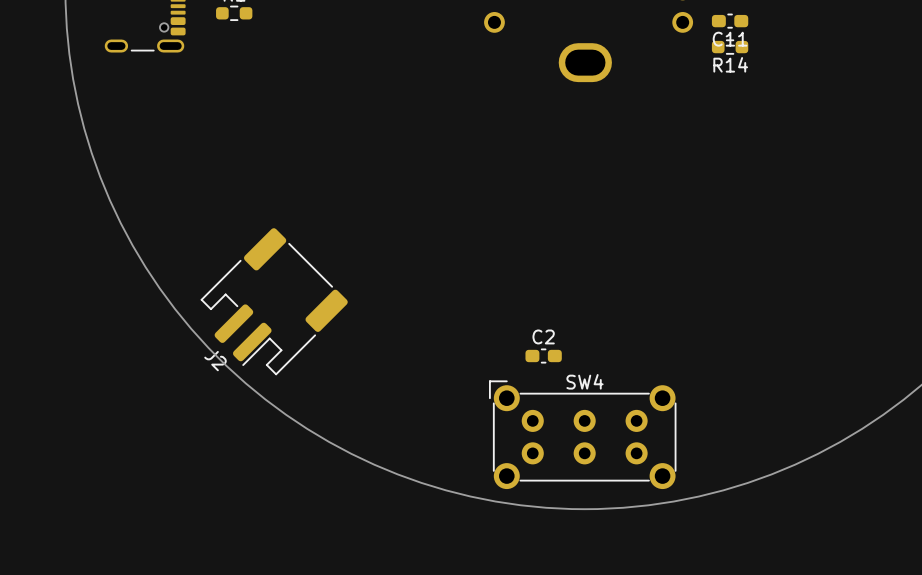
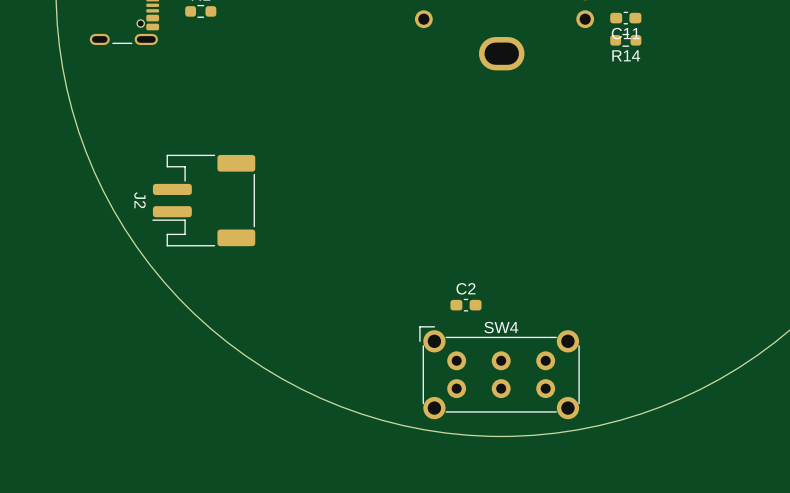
J2 rotation: 0° (274, 301) -> 45° clockwise (203, 200)

